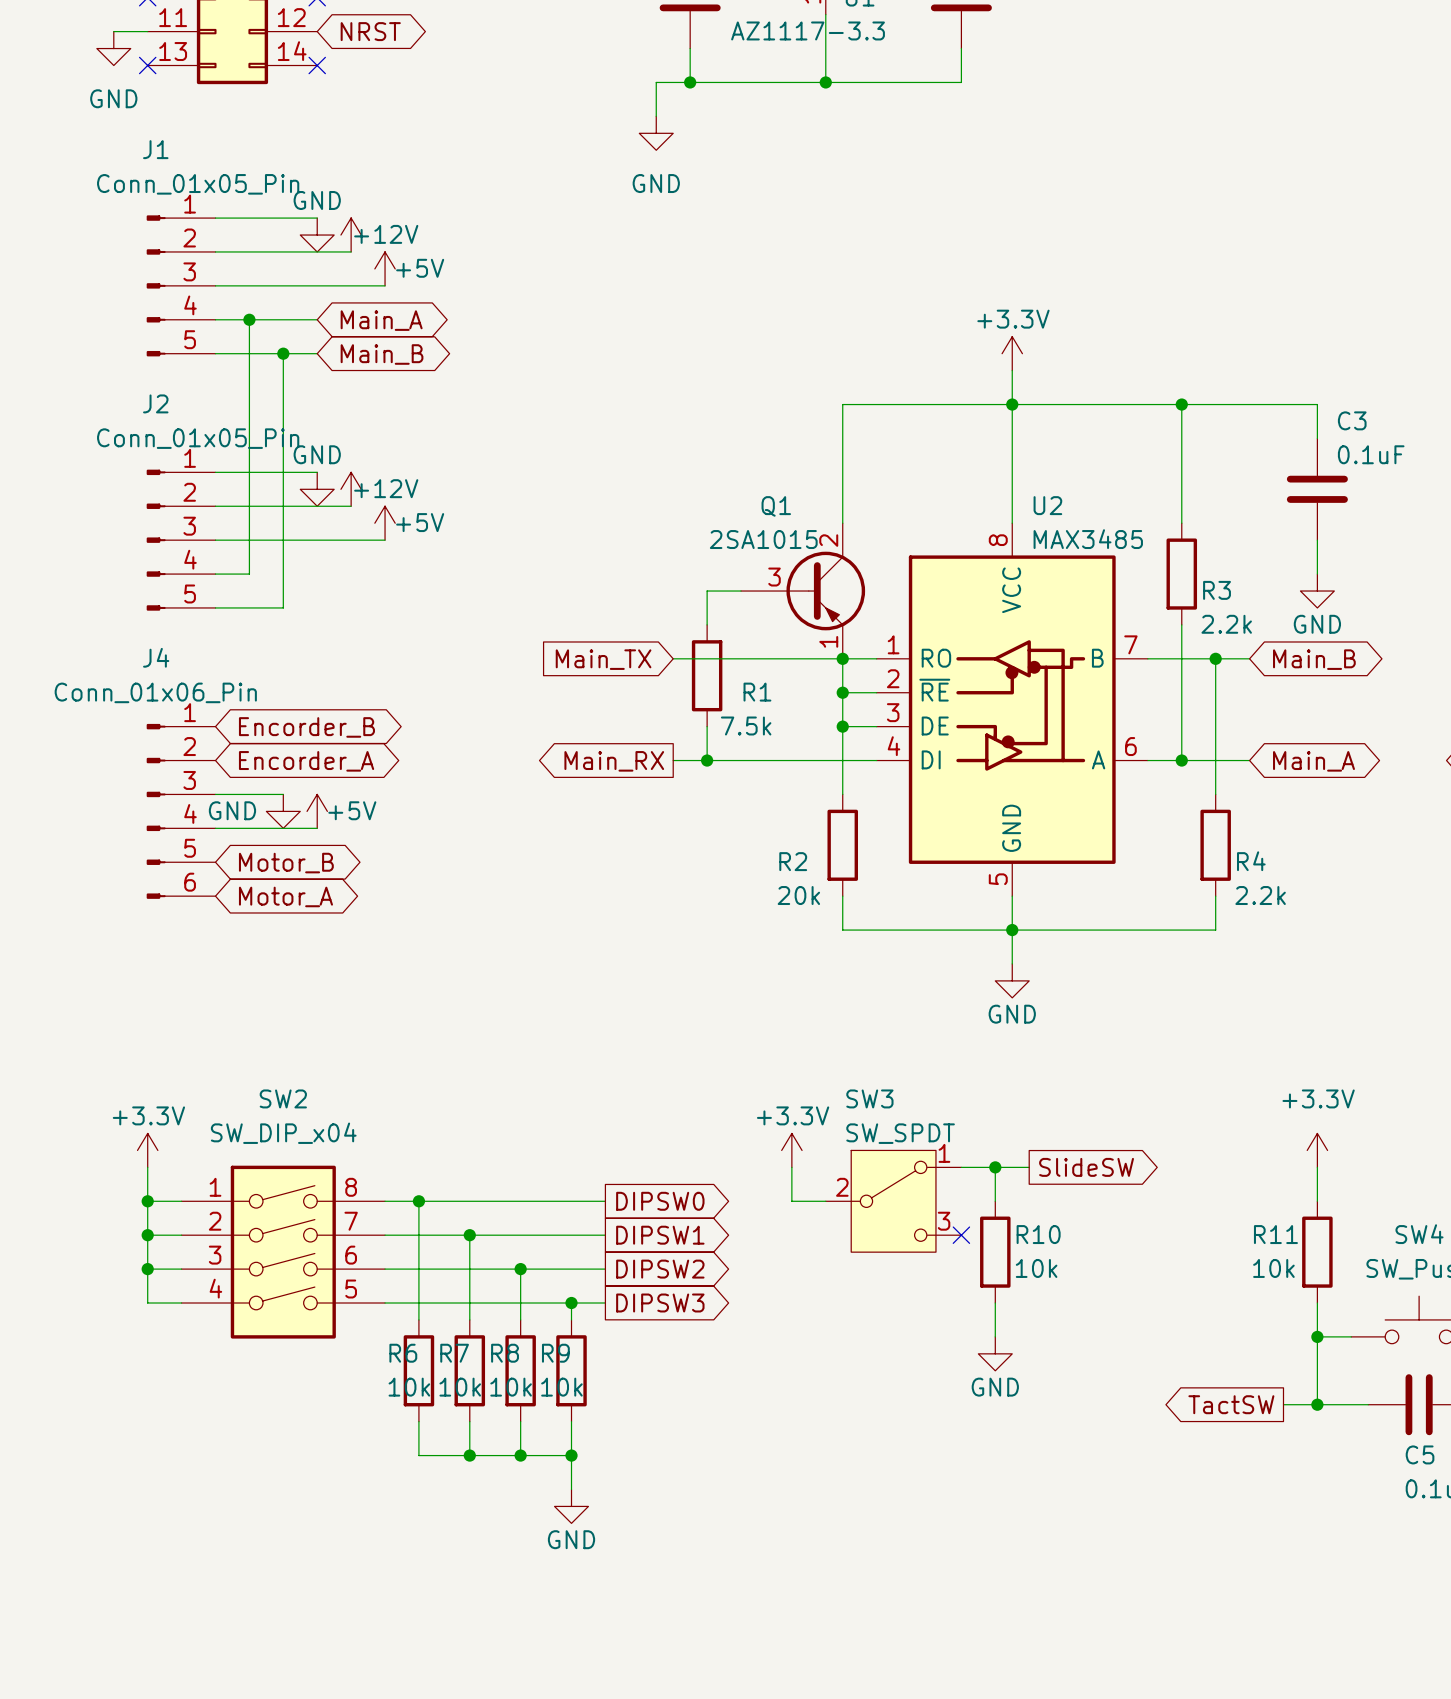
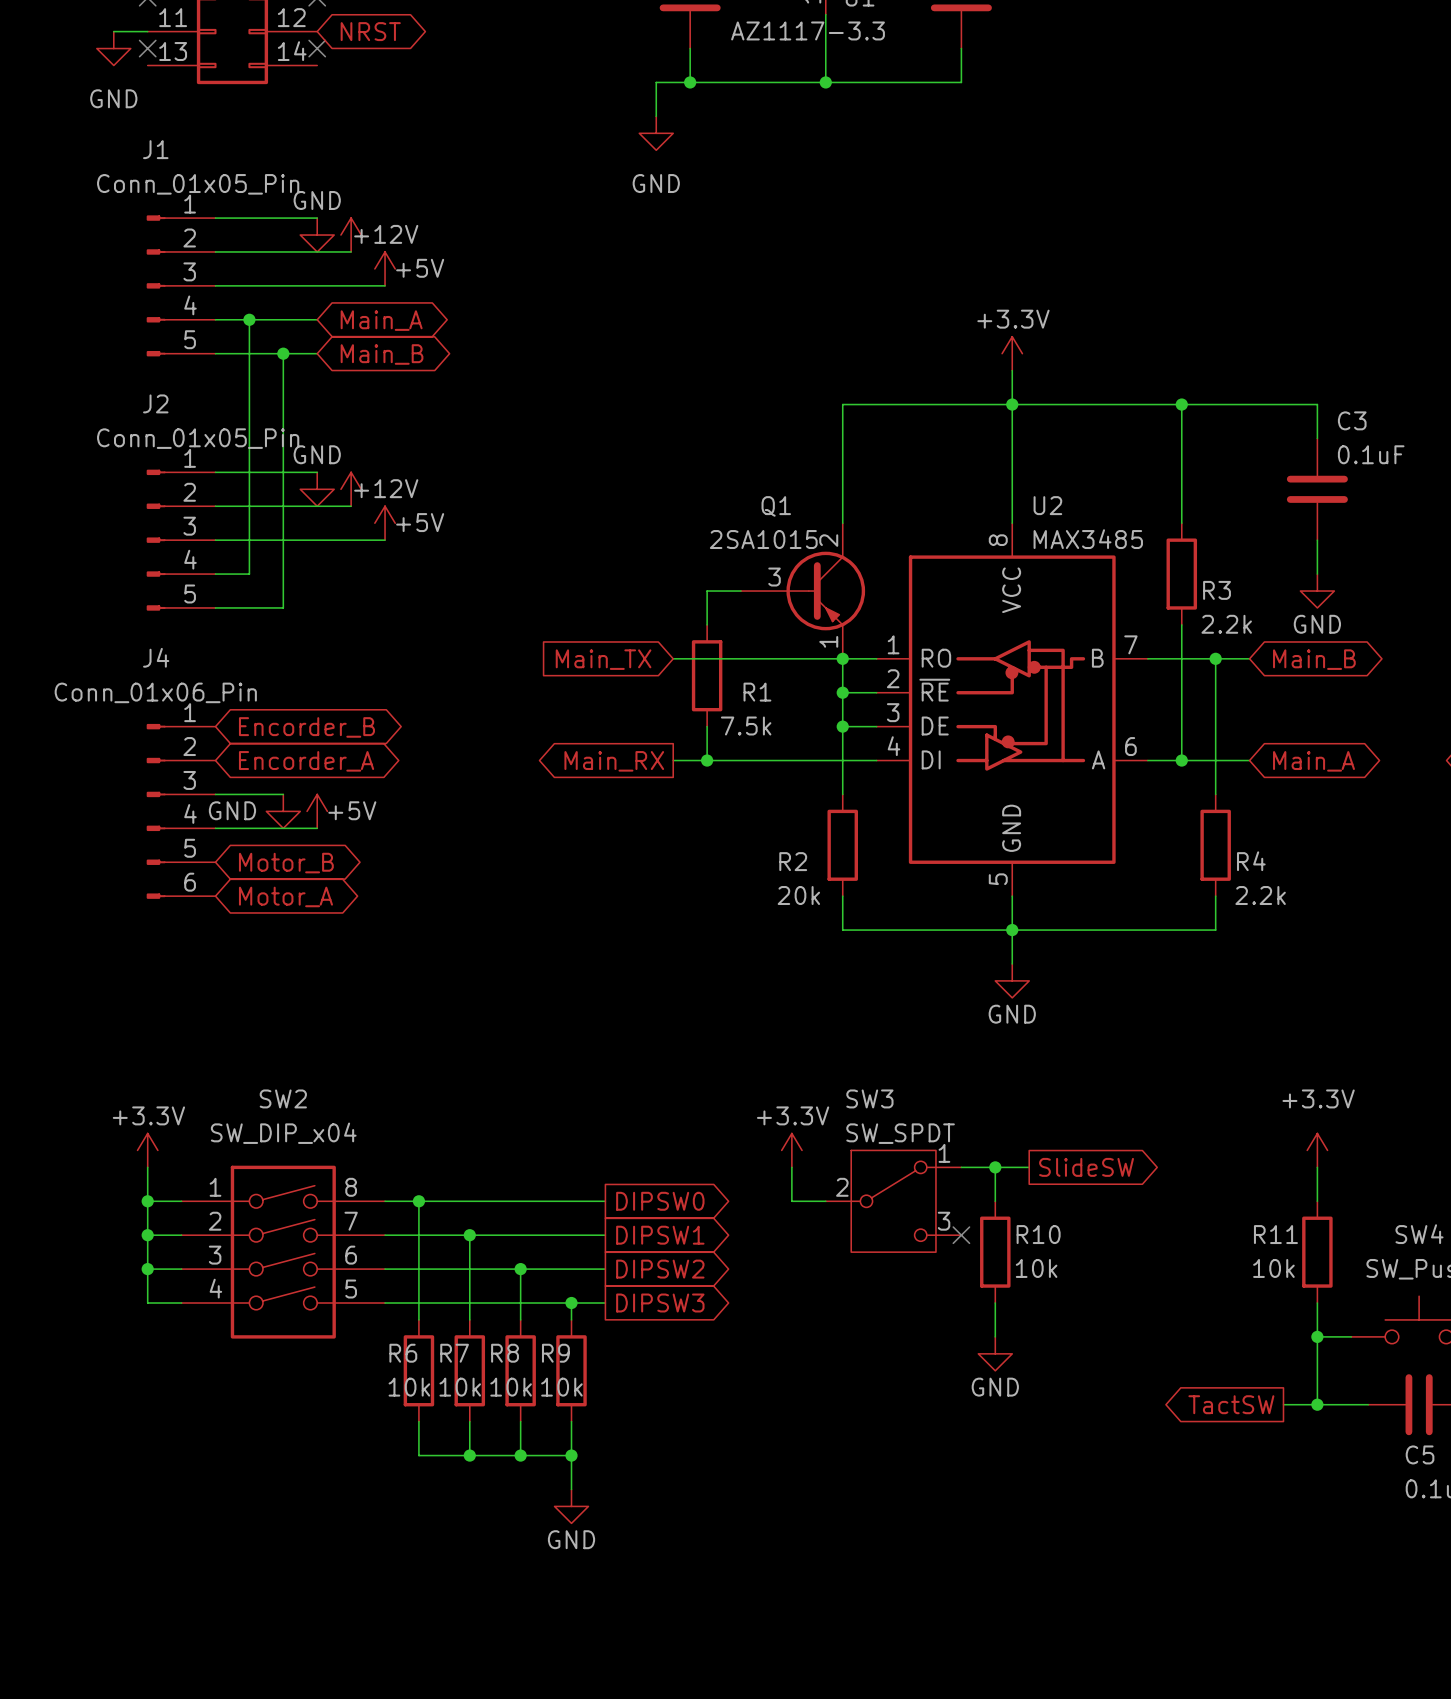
no-connect mark position: (147, 65) -> (147, 48)
no-connect mark position: (317, 65) -> (317, 48)

